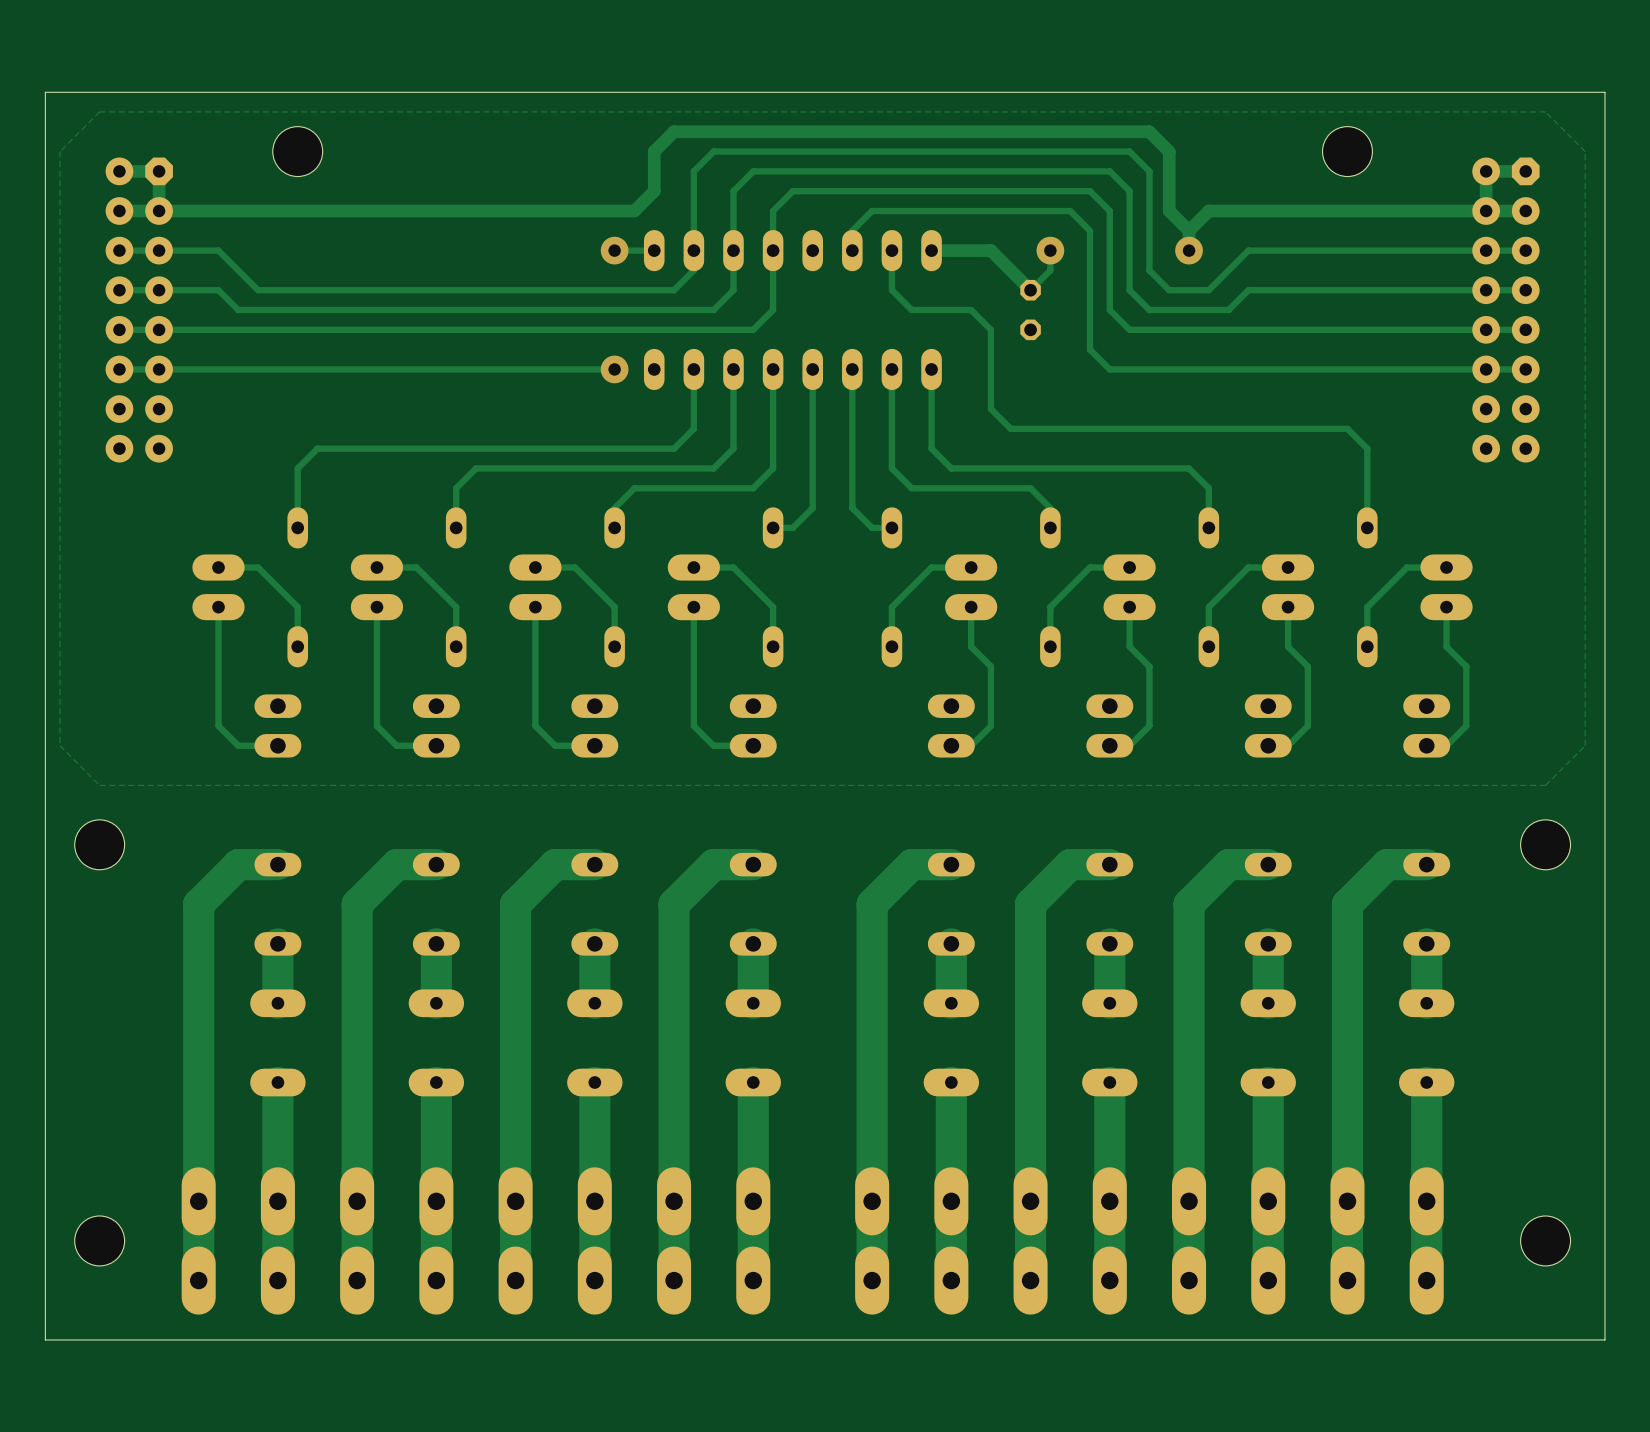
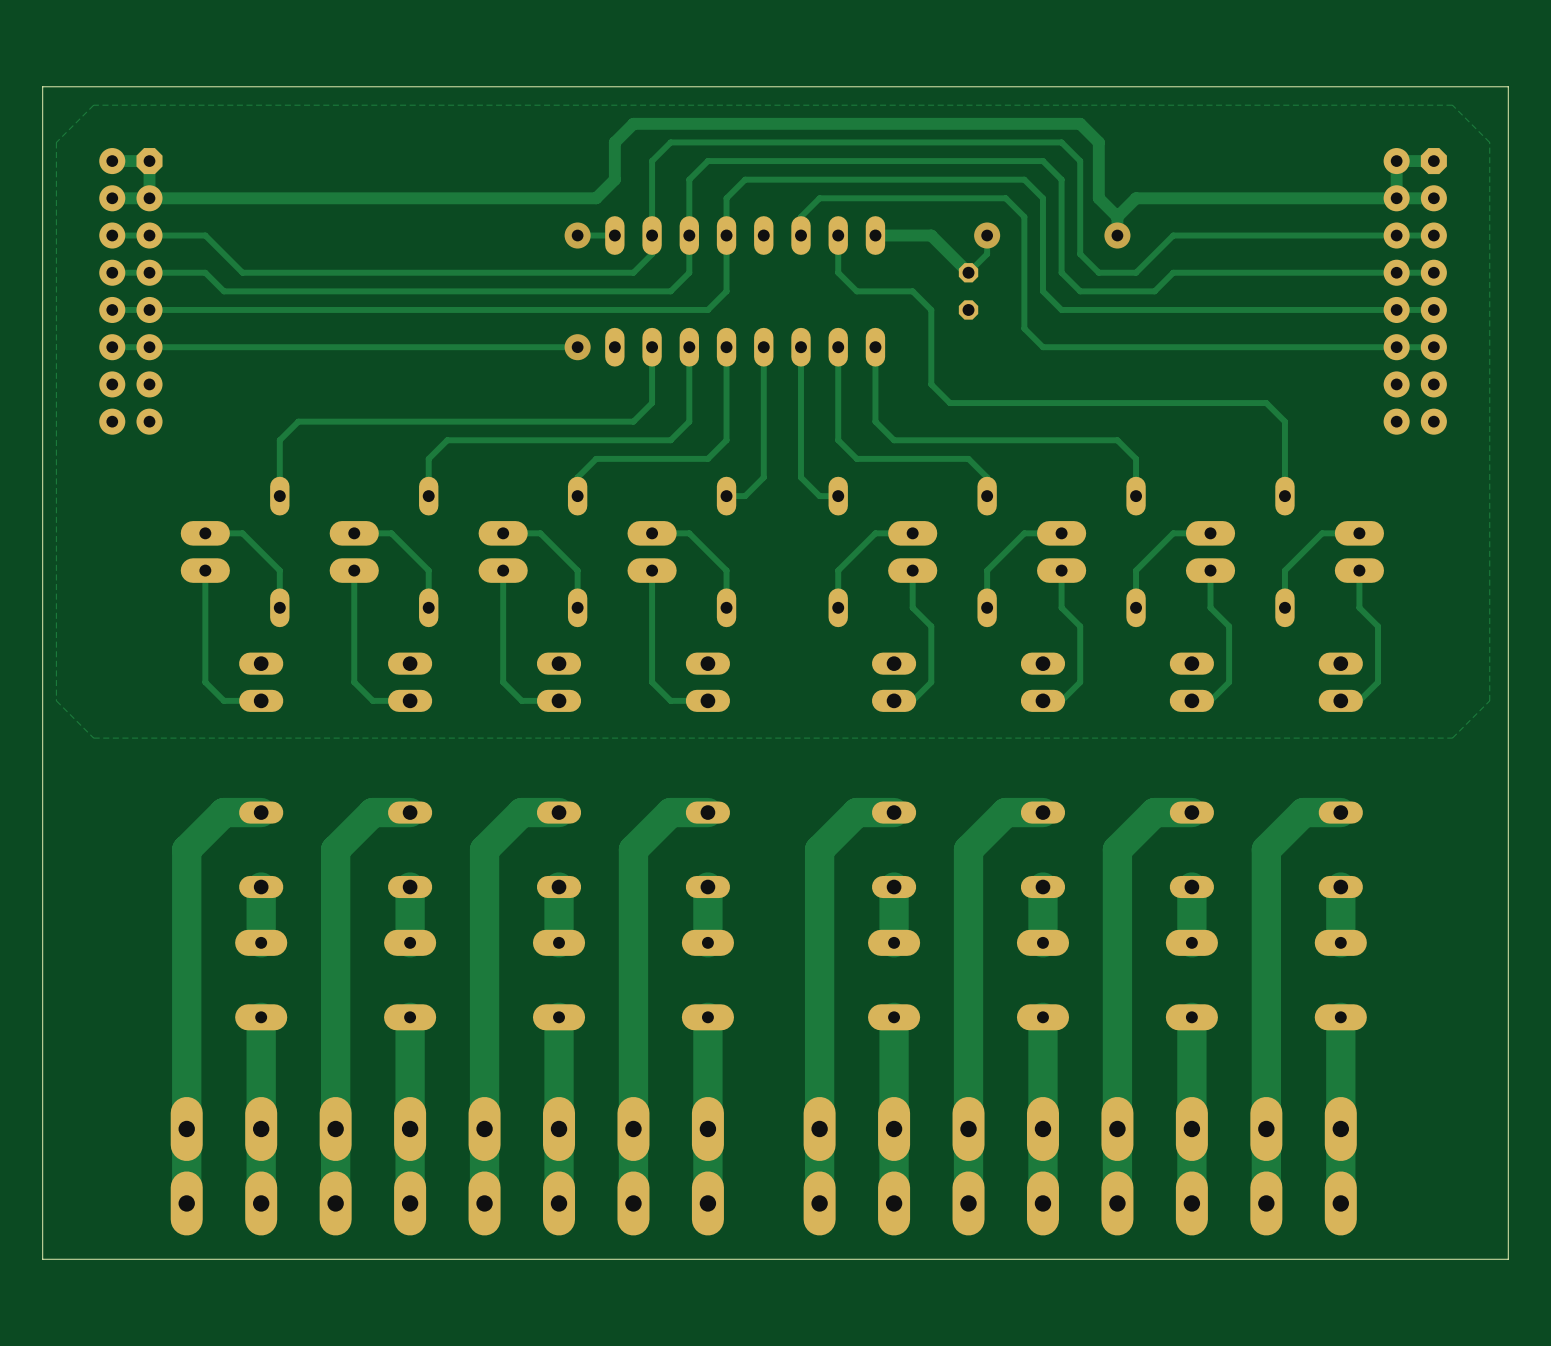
hole: (297, 151) -> none
hole: (1347, 151) -> none
hole: (99, 844) -> none
hole: (1545, 844) -> none
hole: (99, 1240) -> none
hole: (1545, 1240) -> none

